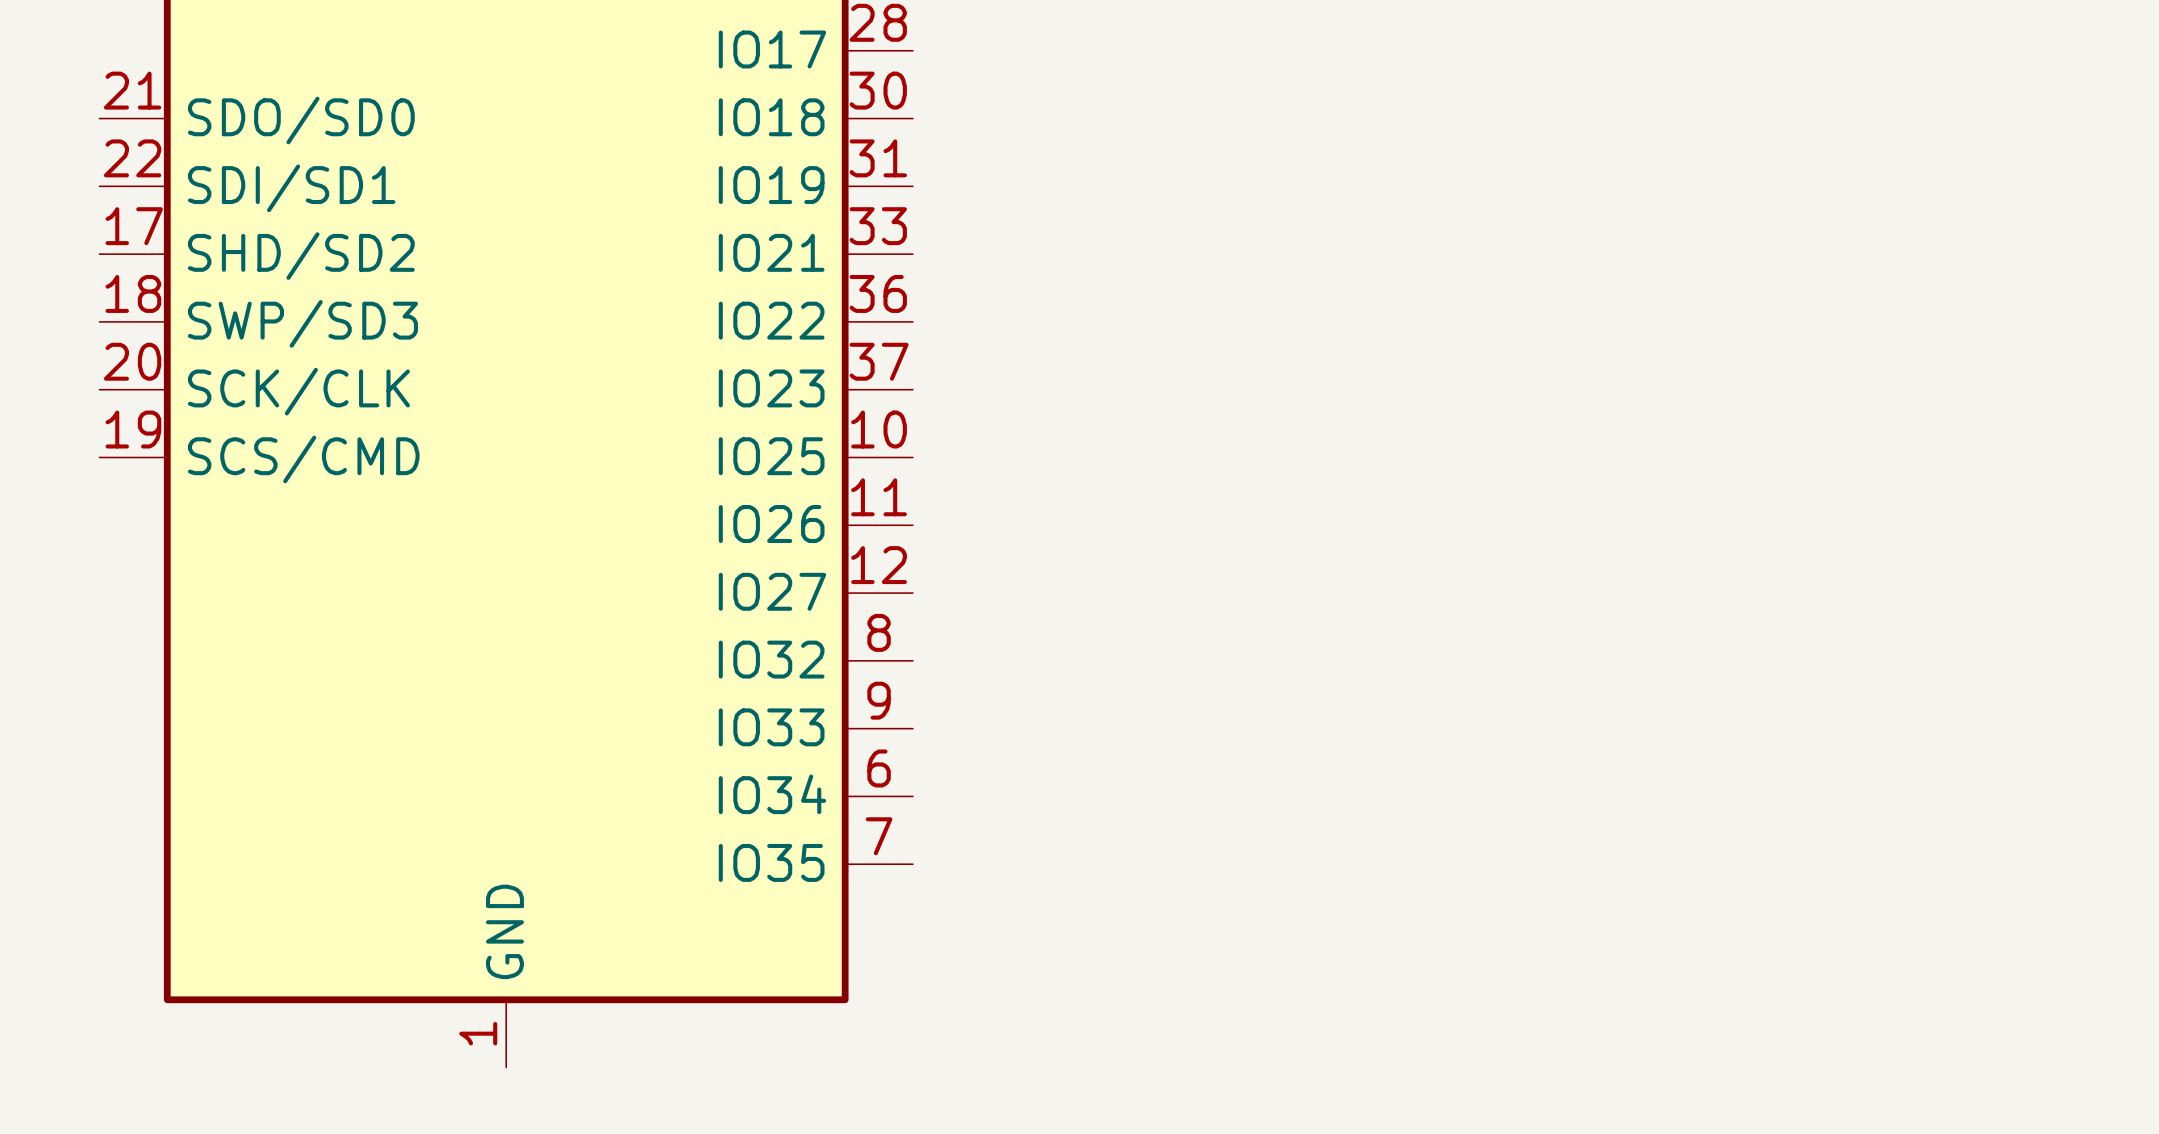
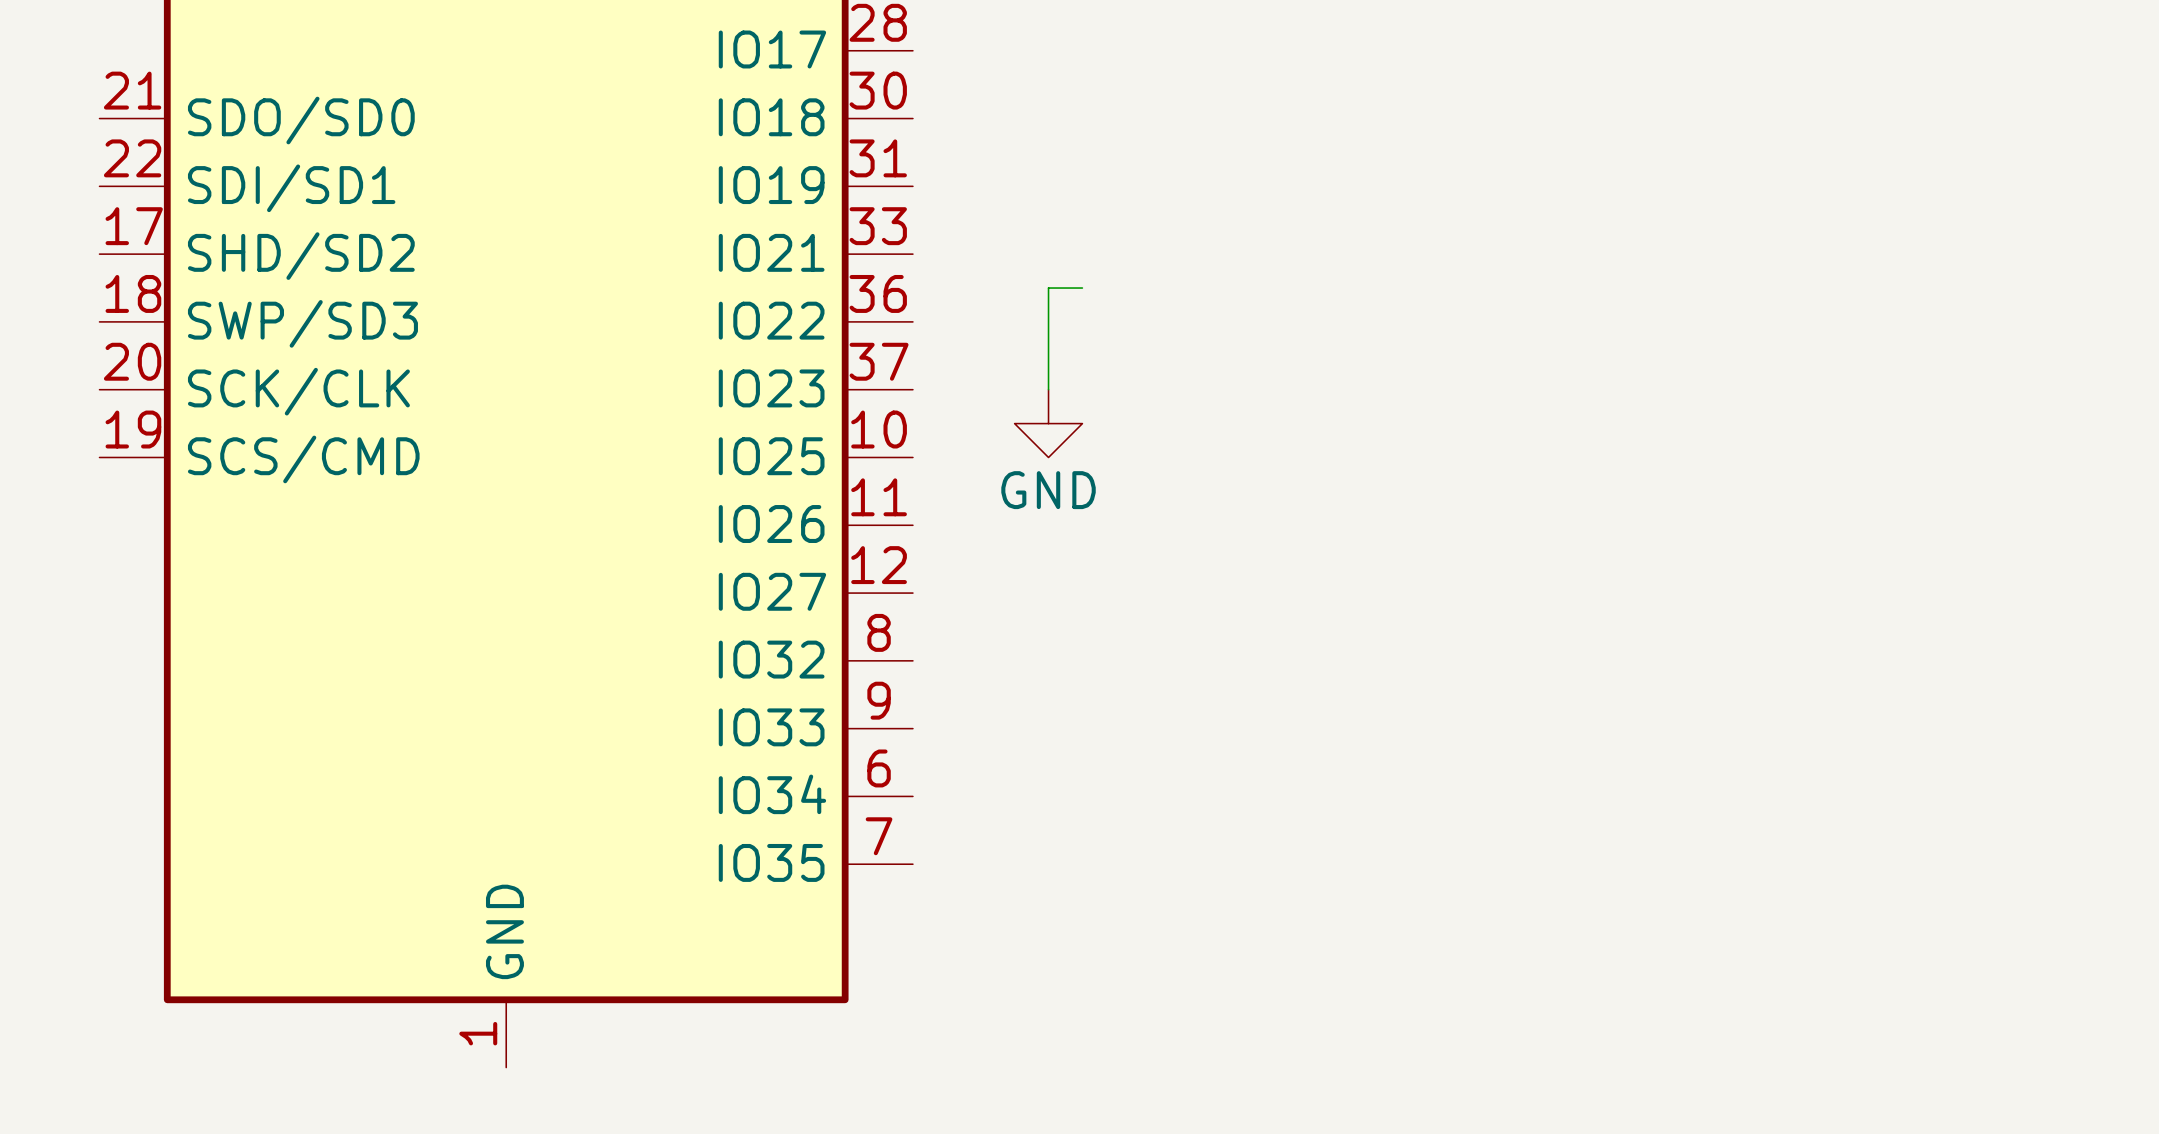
wire: none -> (1082, 288) (1048, 288) (1048, 389)
power symbol: none -> GND (1048, 423)

